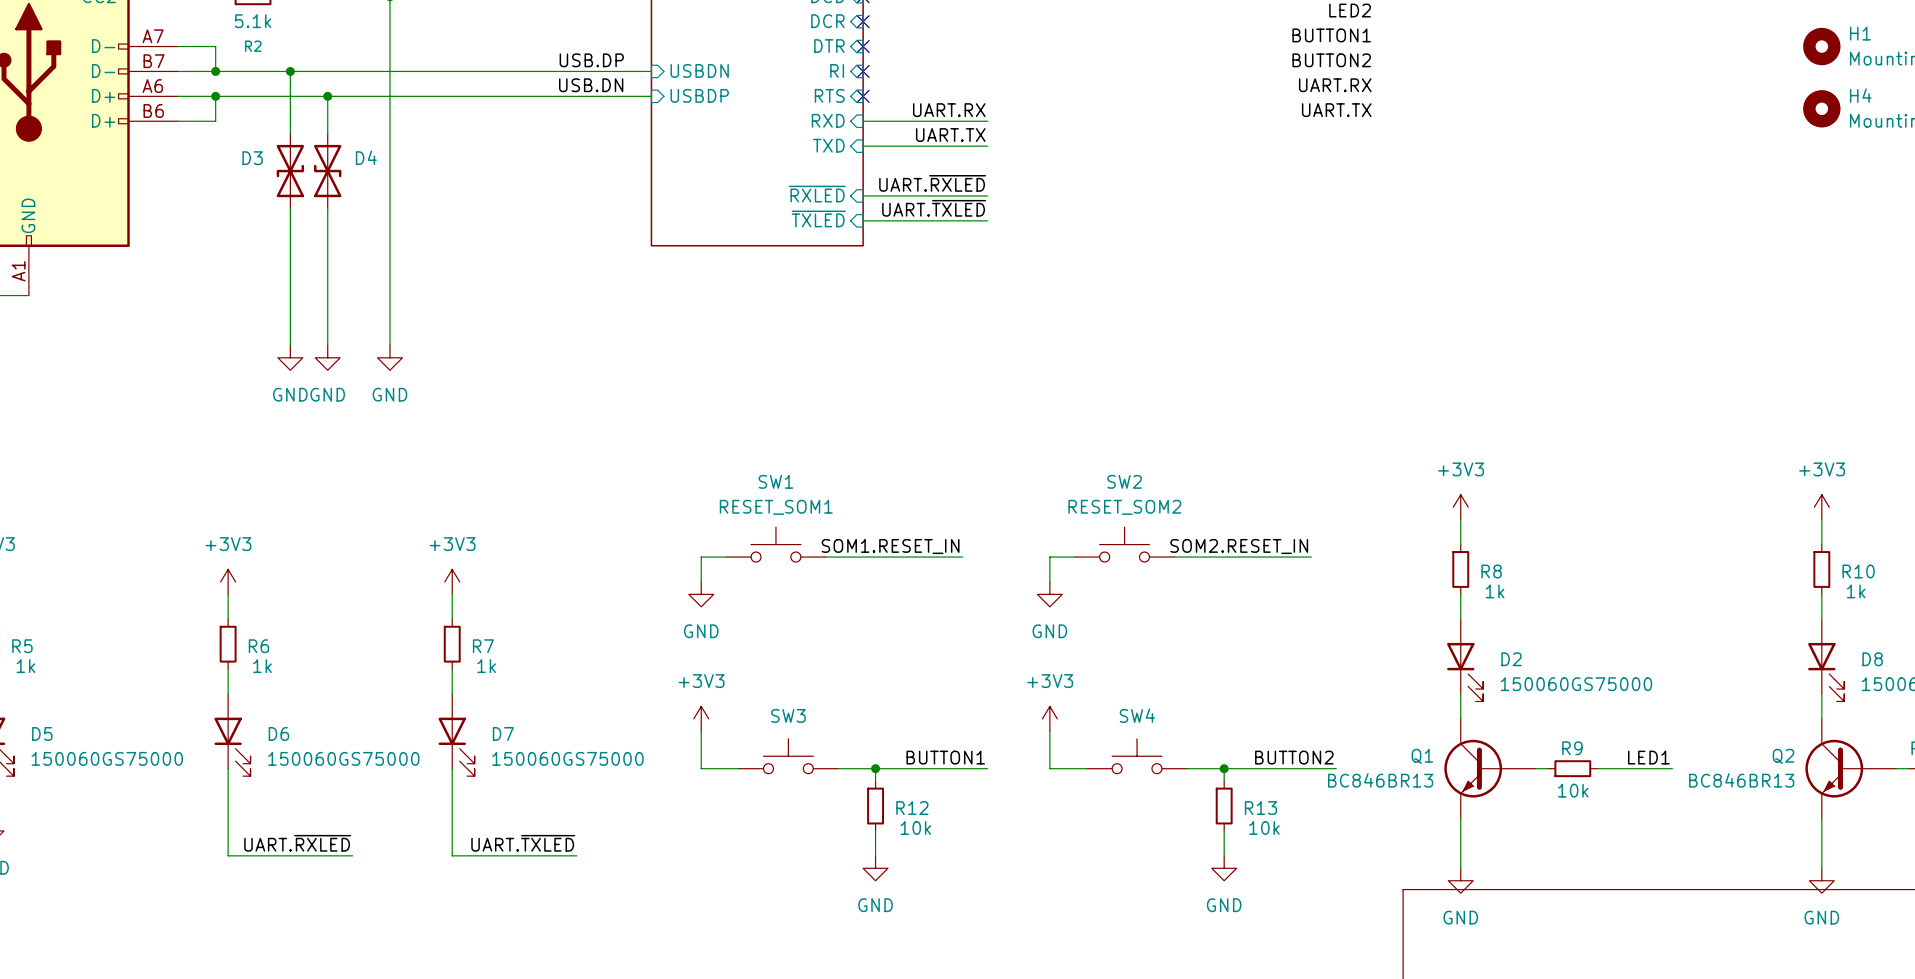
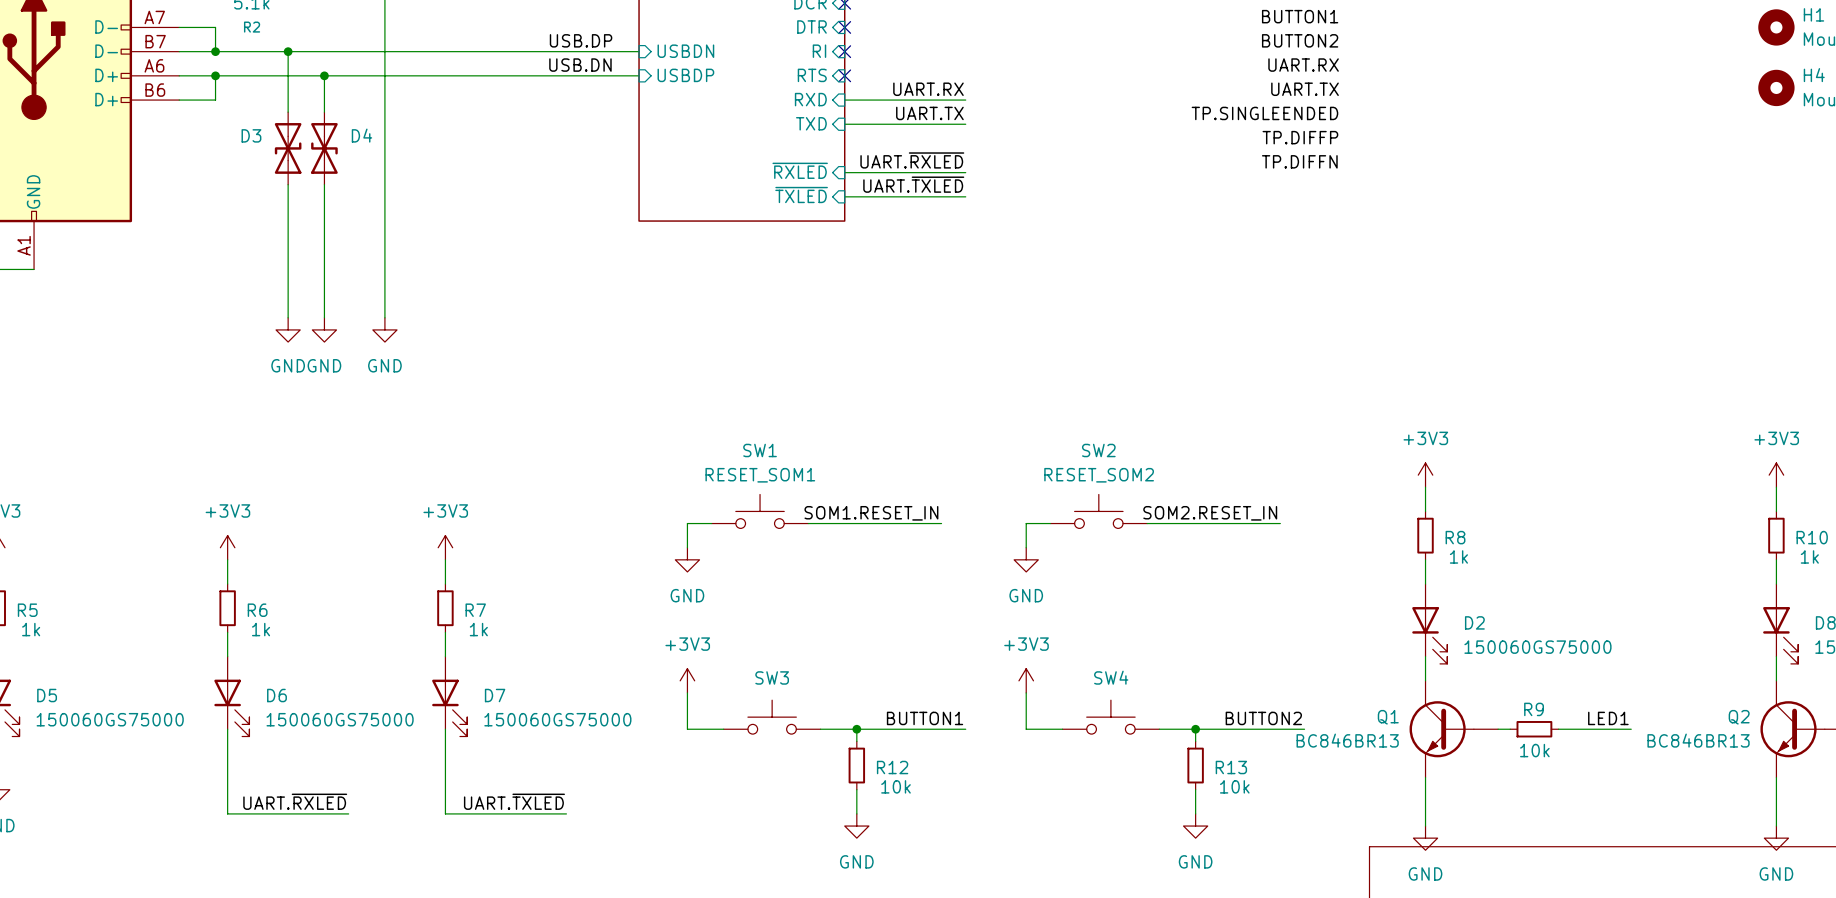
label: none -> TP.SINGLEENDED (1264, 113)
label: none -> TP.DIFFP (1300, 137)
label: none -> TP.DIFFN (1299, 161)

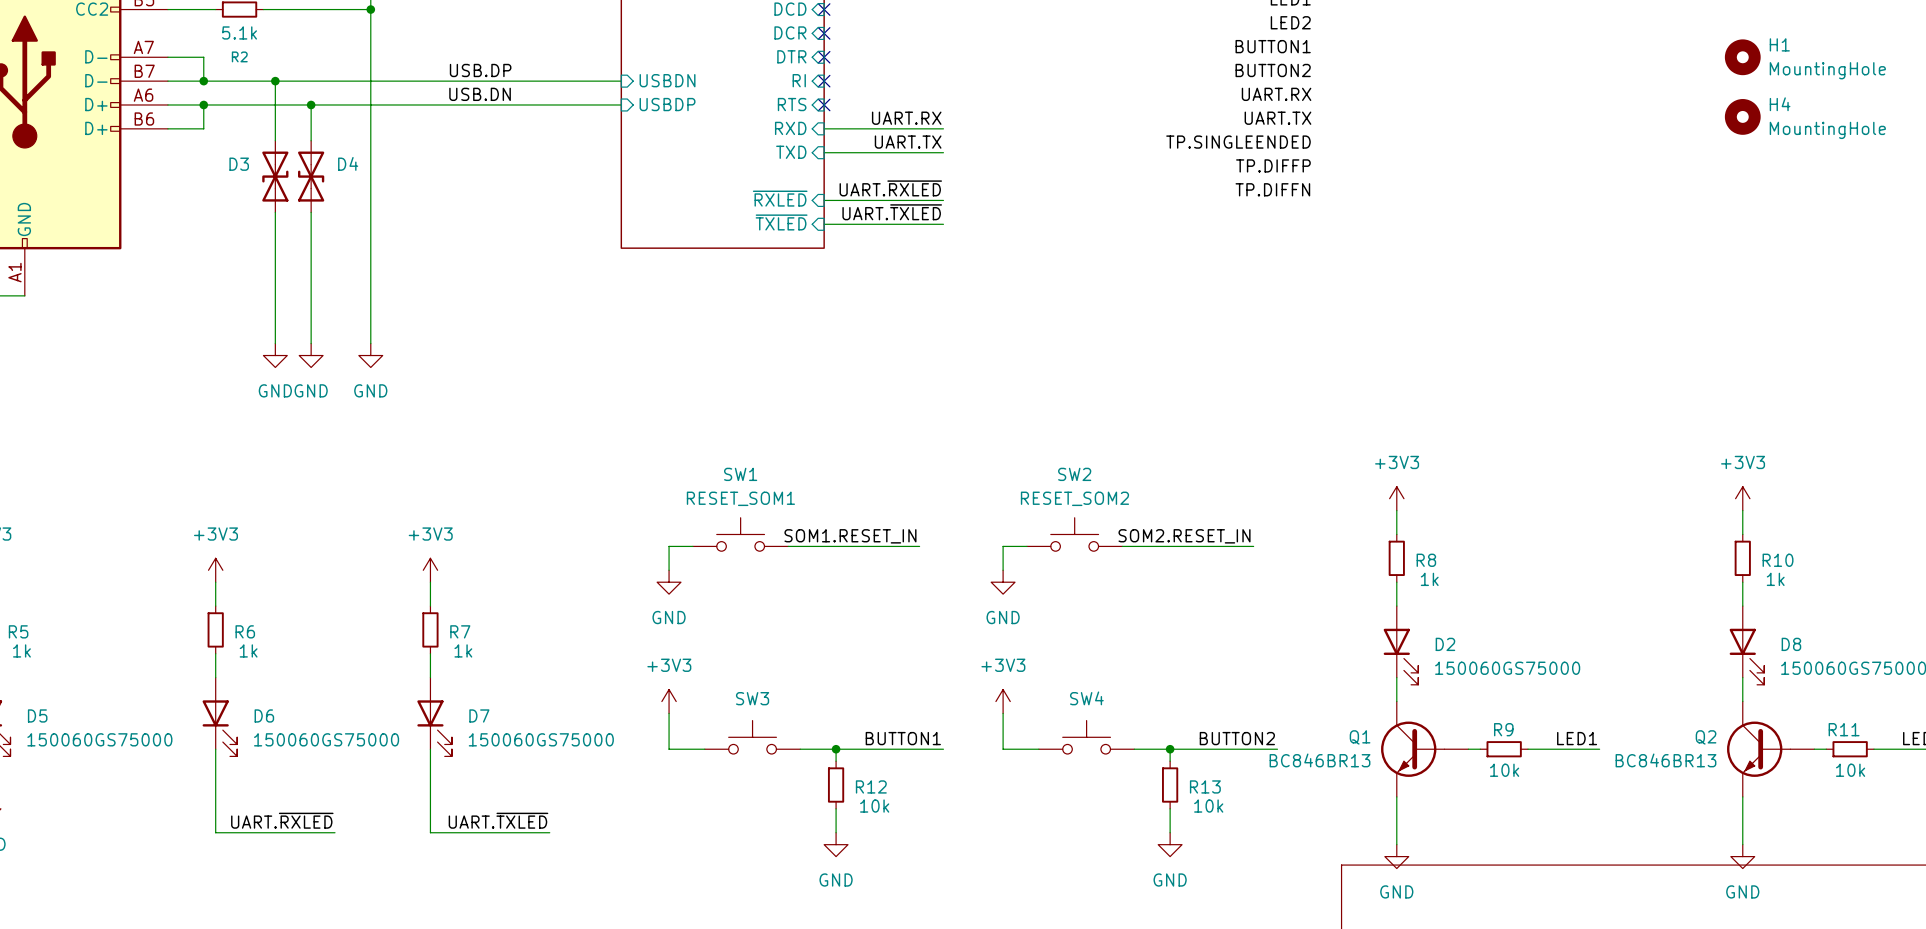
label position: USB.DP (581, 40) -> USB.DP (480, 70)
label position: USB.DN (580, 65) -> USB.DN (480, 94)

